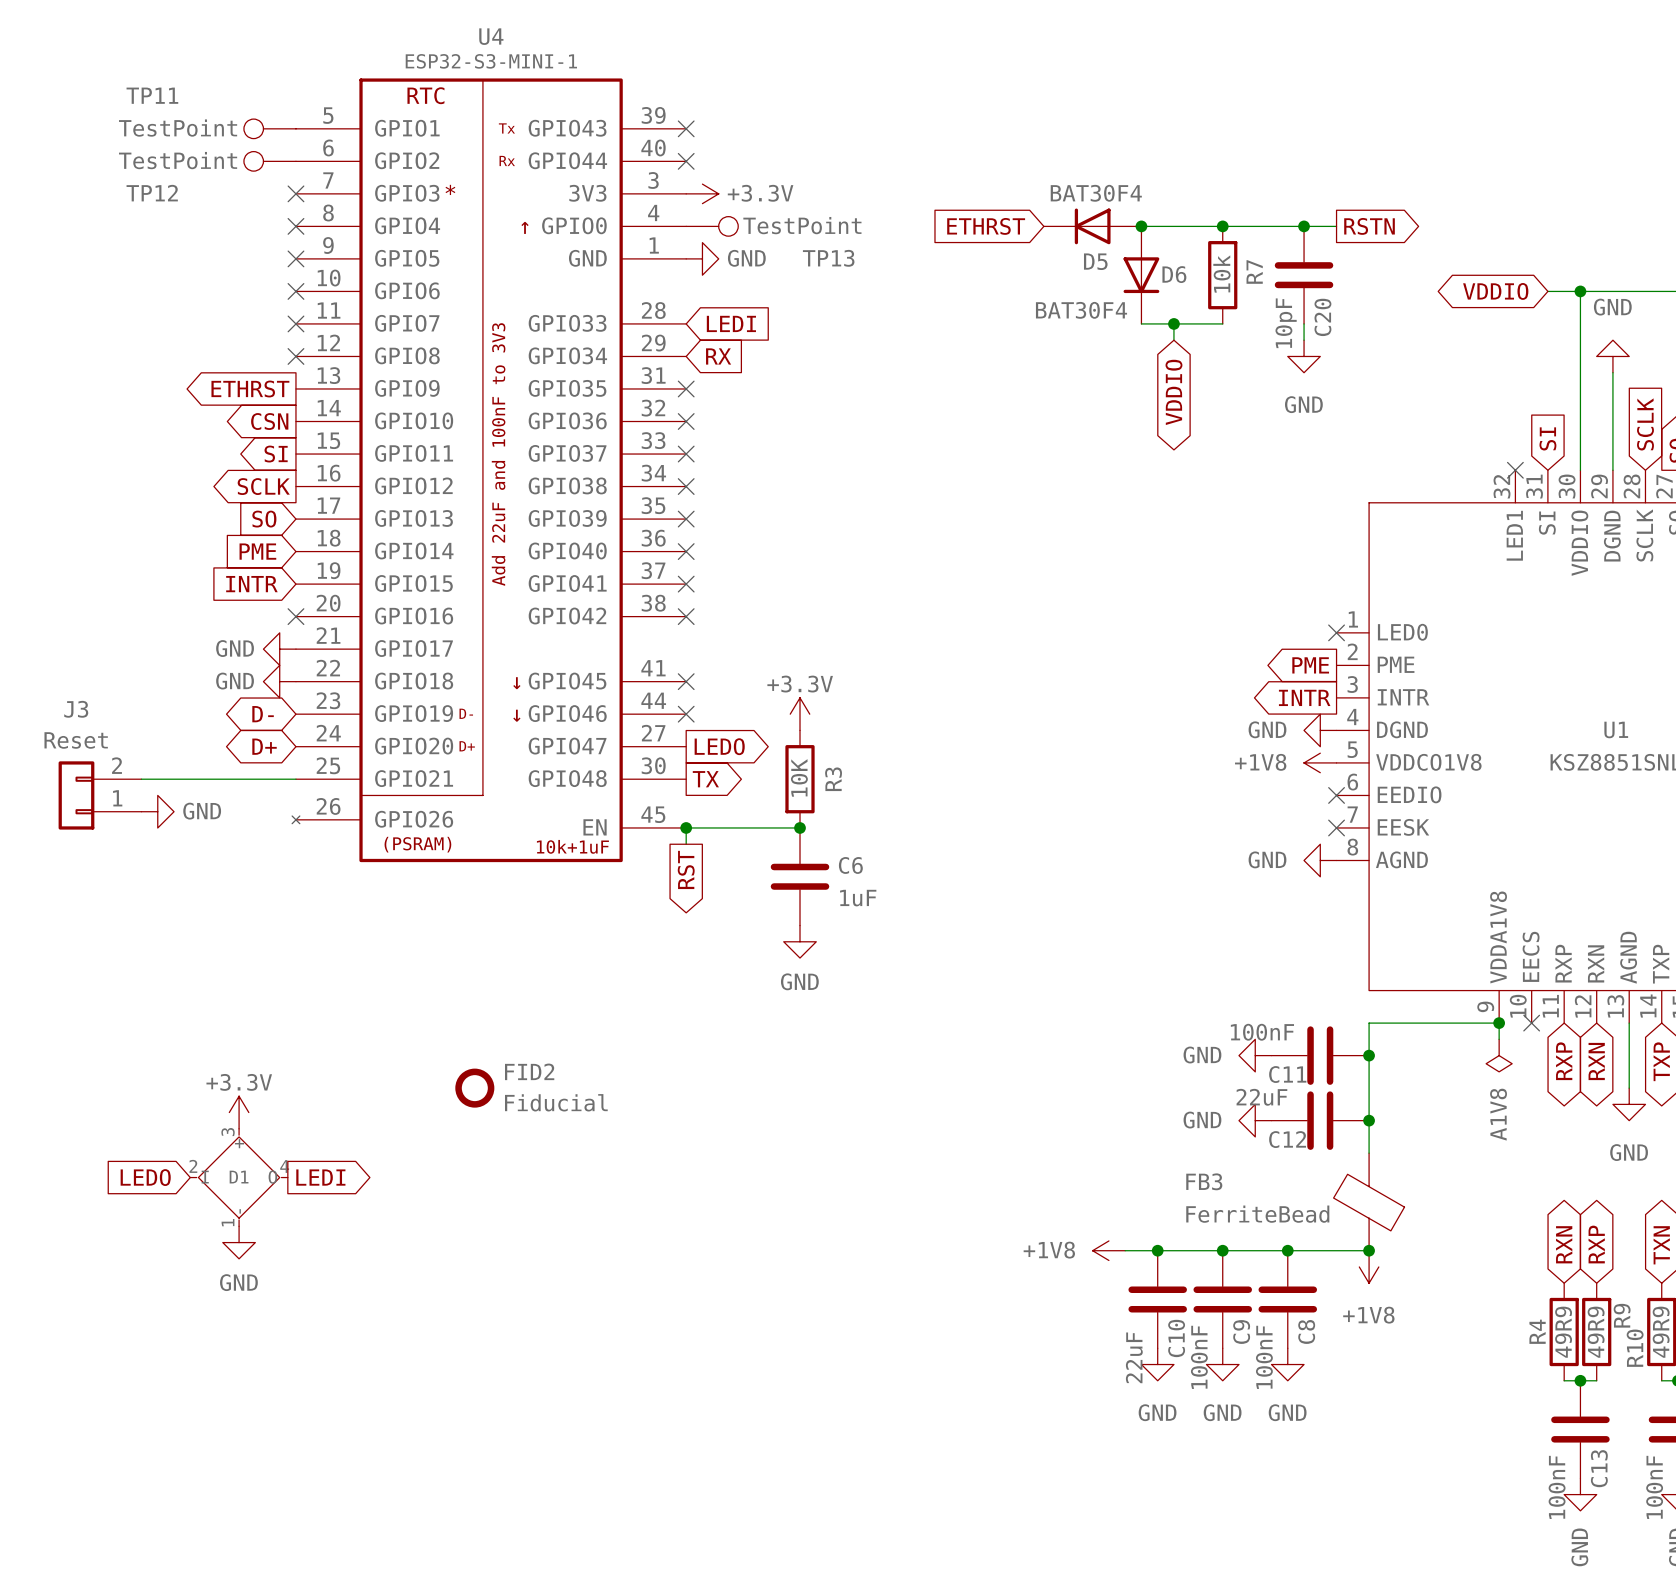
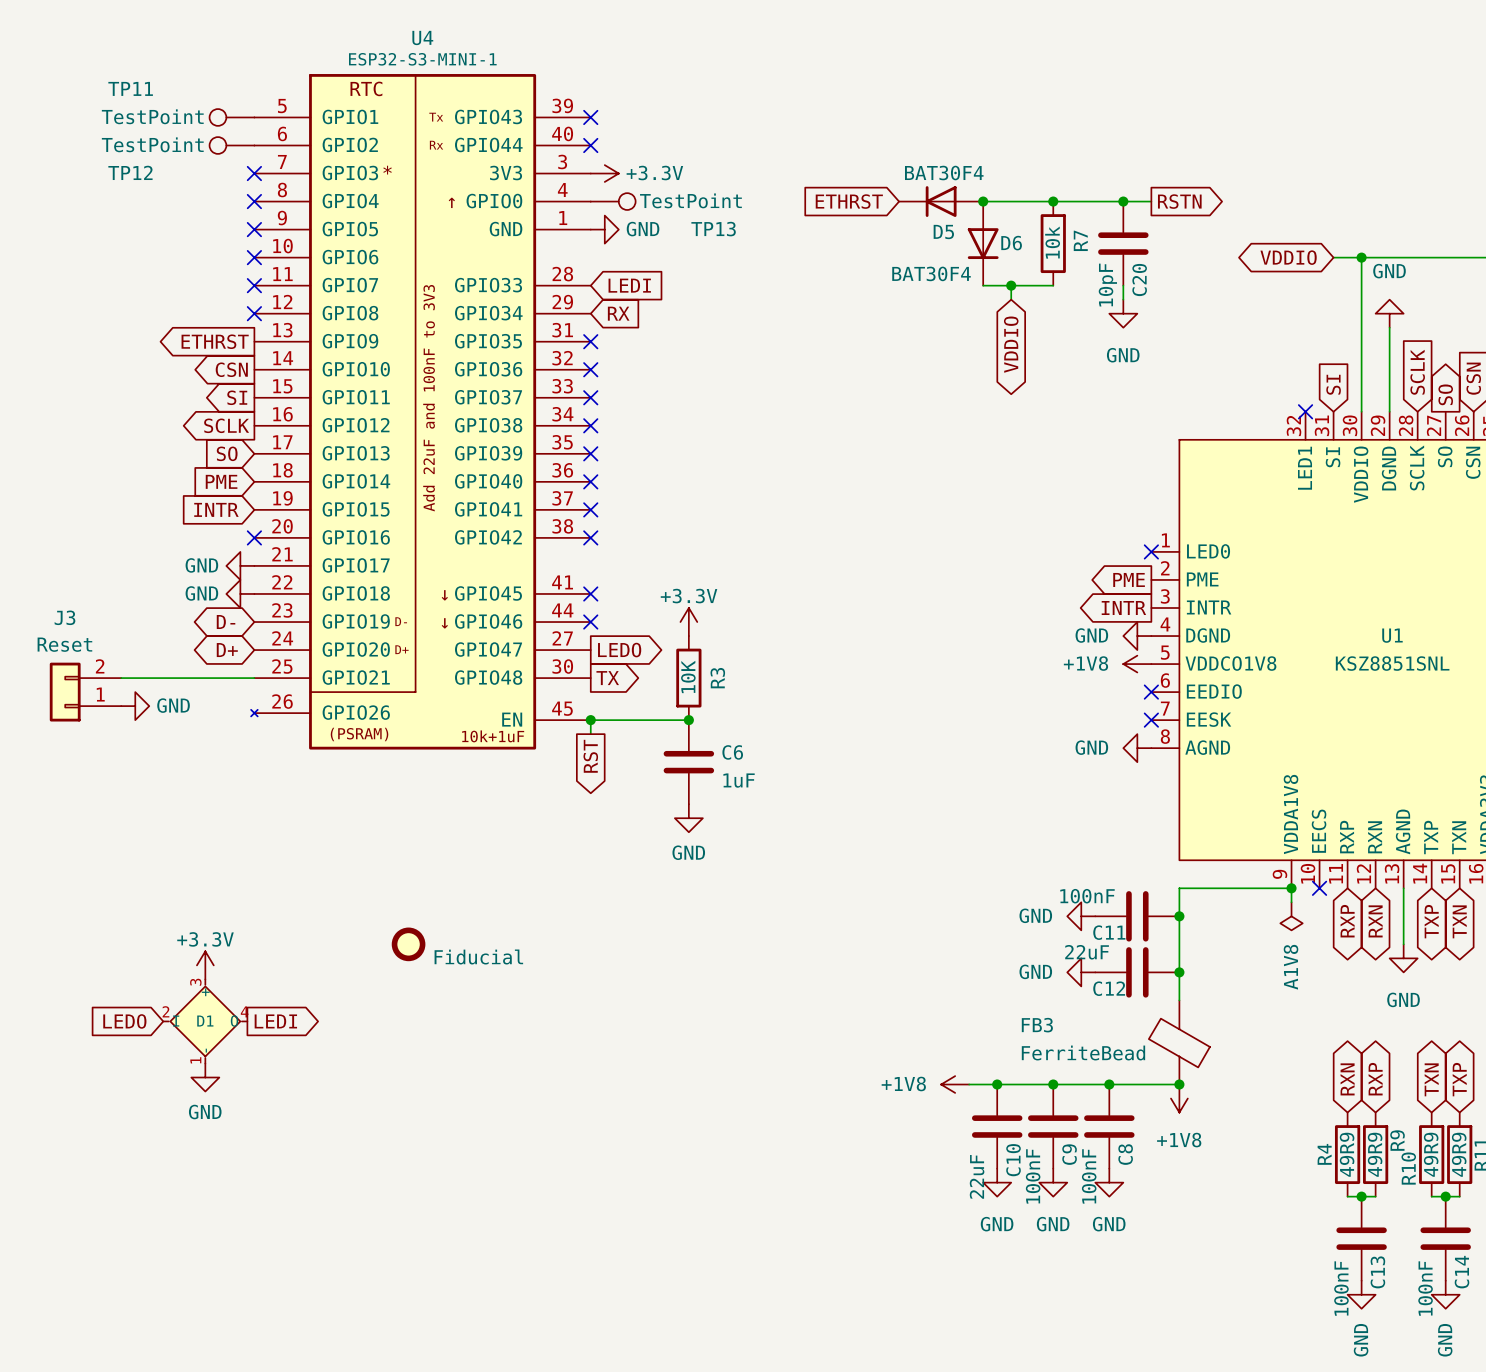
FID2 name: FID2 (529, 1071) -> none

